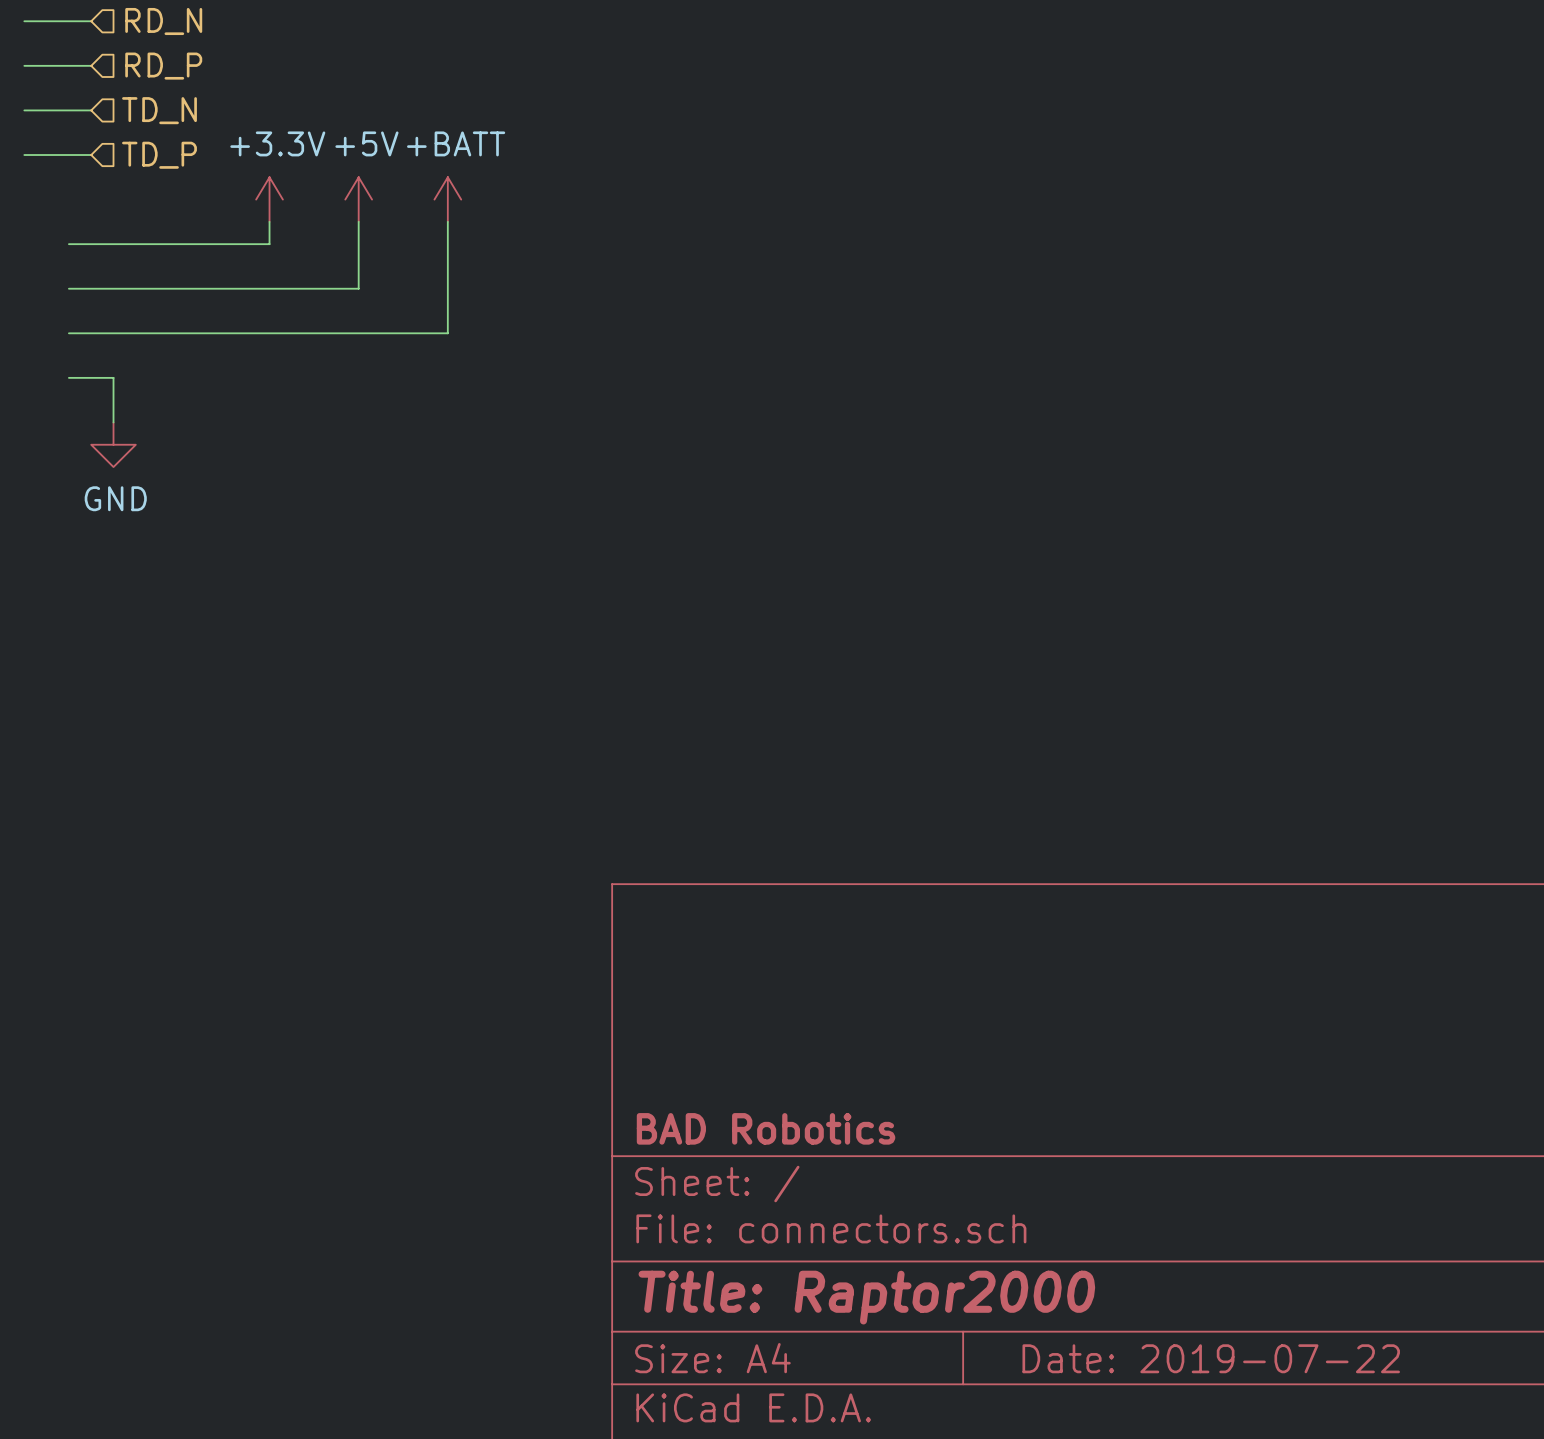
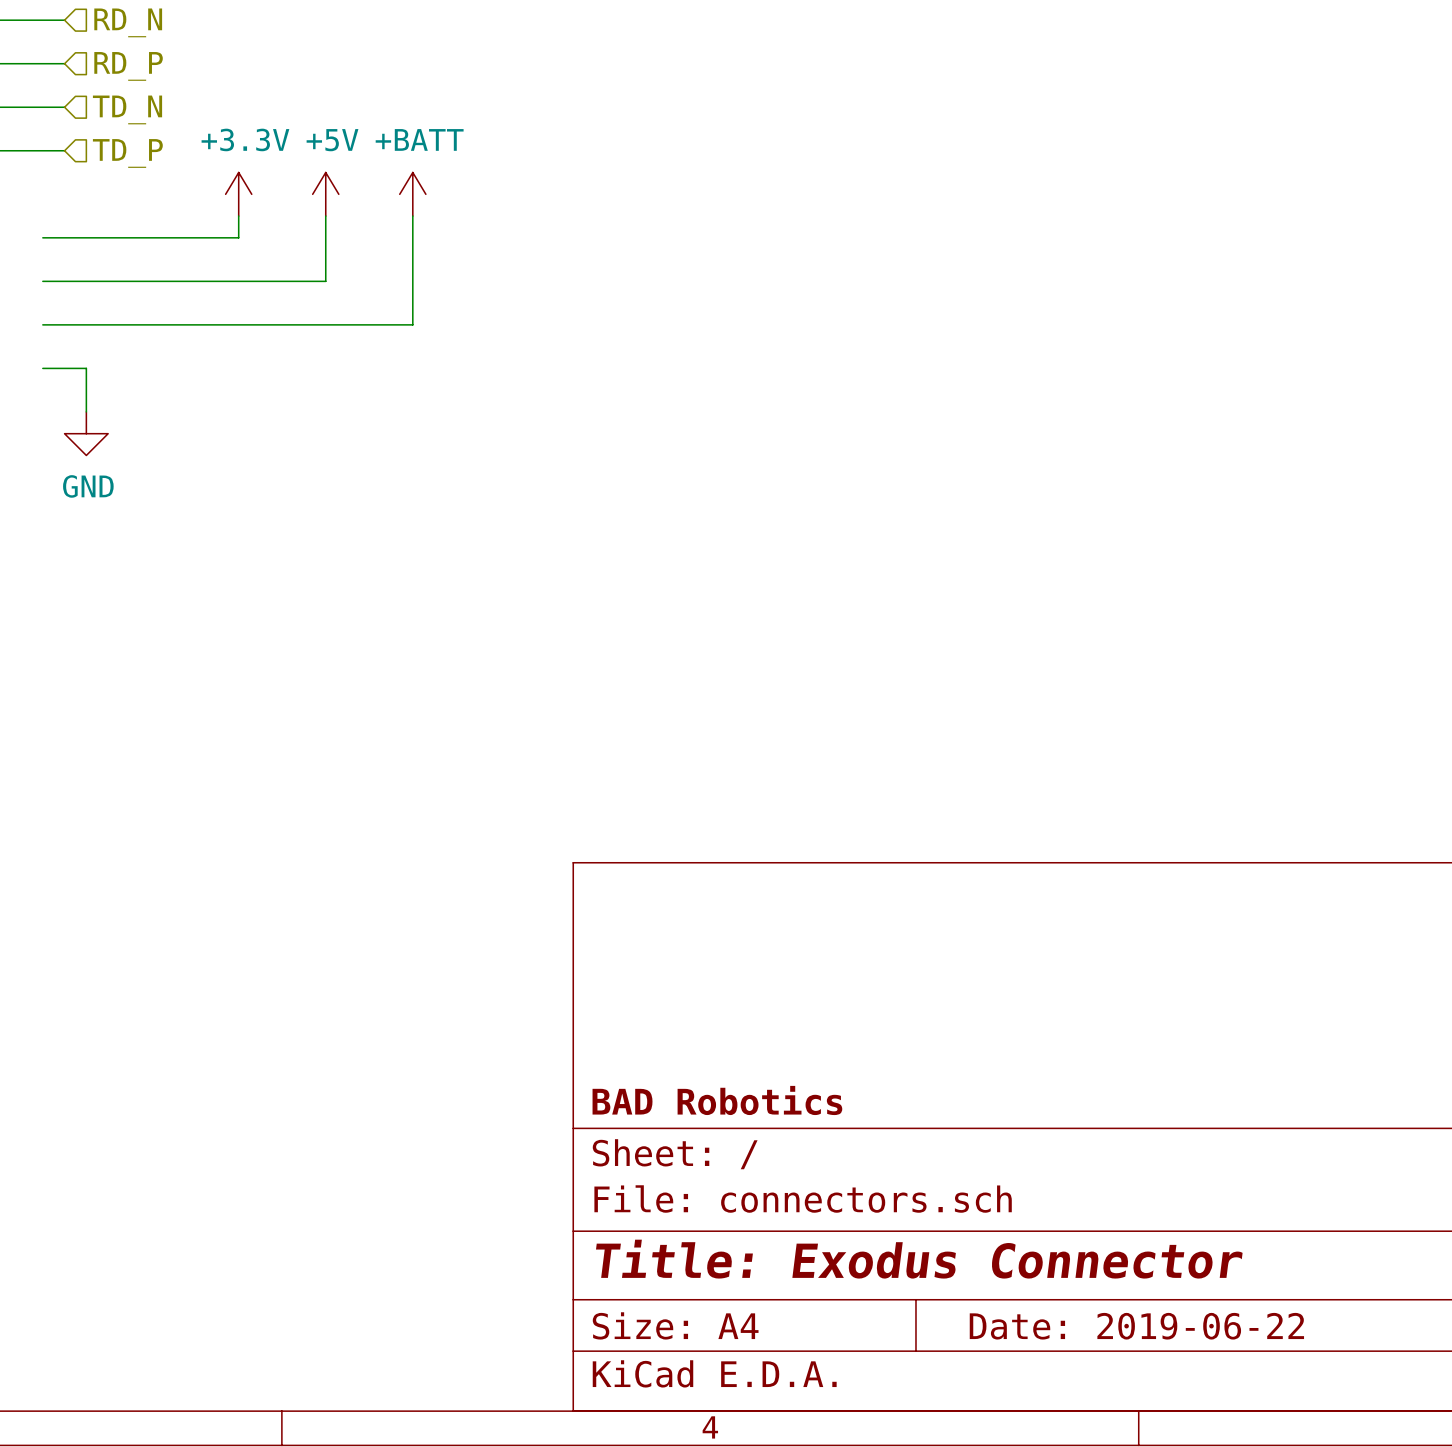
title block: Title: Raptor2000 (866, 1297) -> Title: Exodus Connector (919, 1259)
title block: Date: 2019-07-22 (1211, 1358) -> Date: 2019-06-22 (1136, 1326)

